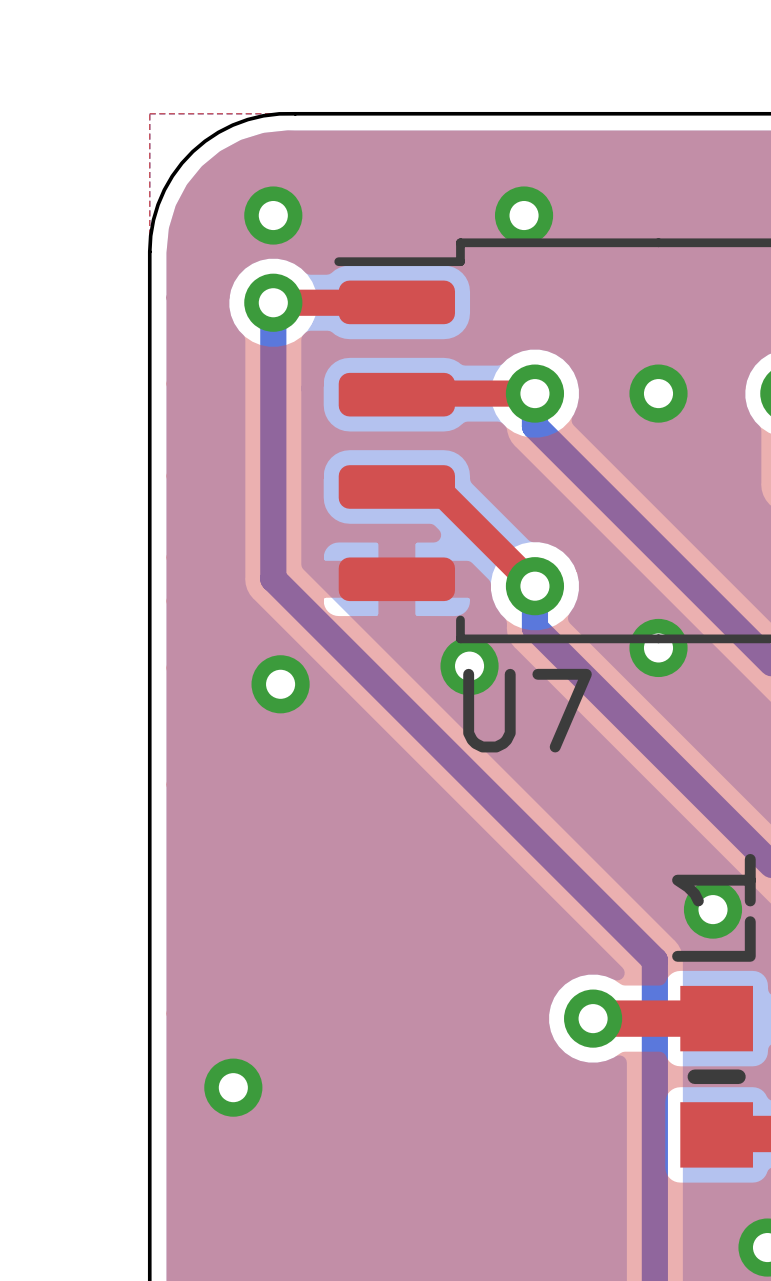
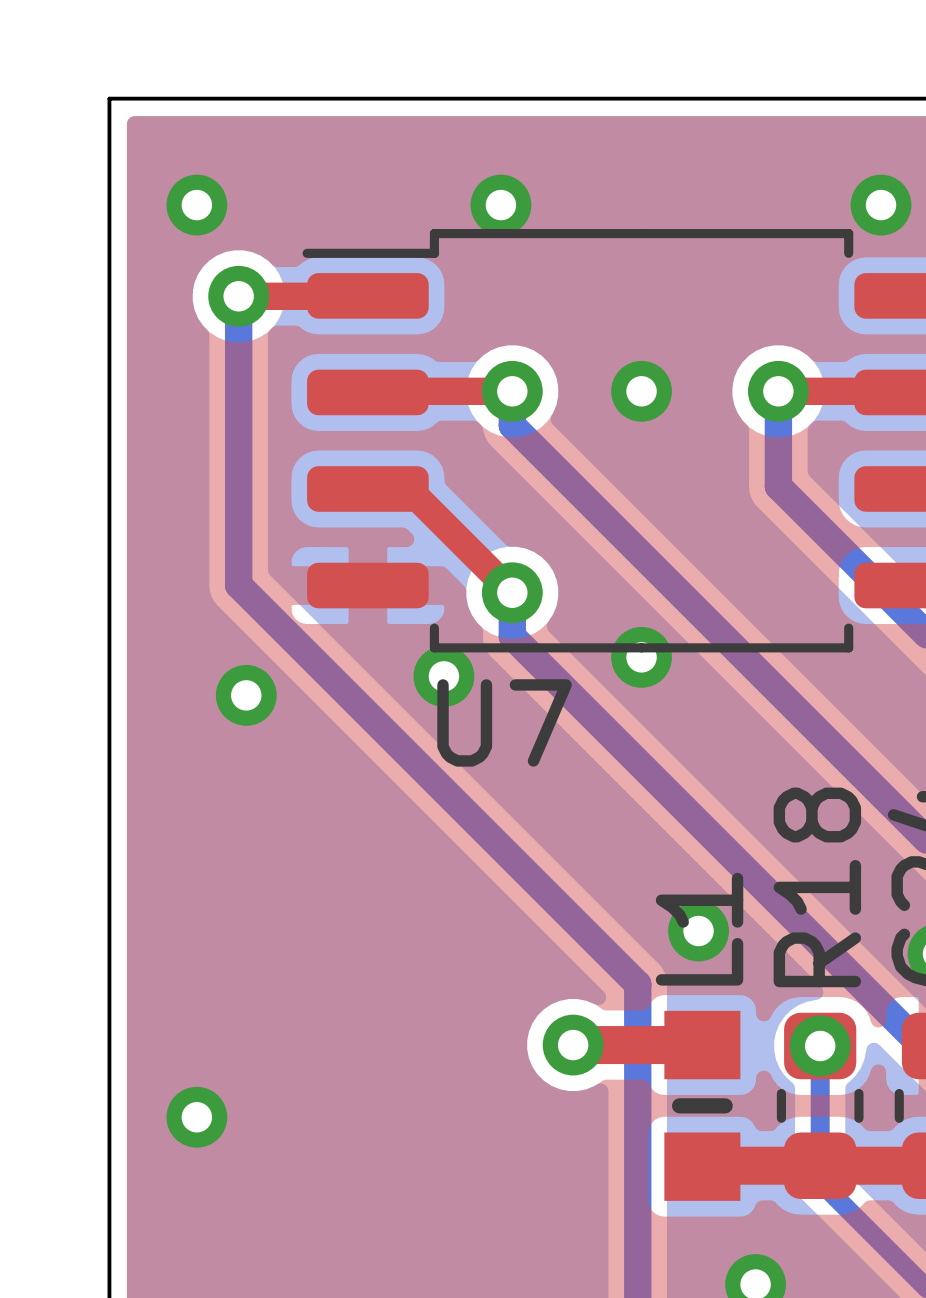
board edge: (295, 113) (263, 115) (232, 125) (205, 141) (192, 151) (172, 176) (158, 204) (150, 235) (149, 251) -> (261, 98) (109, 98) (109, 243)
via position: (273, 215) -> (196, 205)

